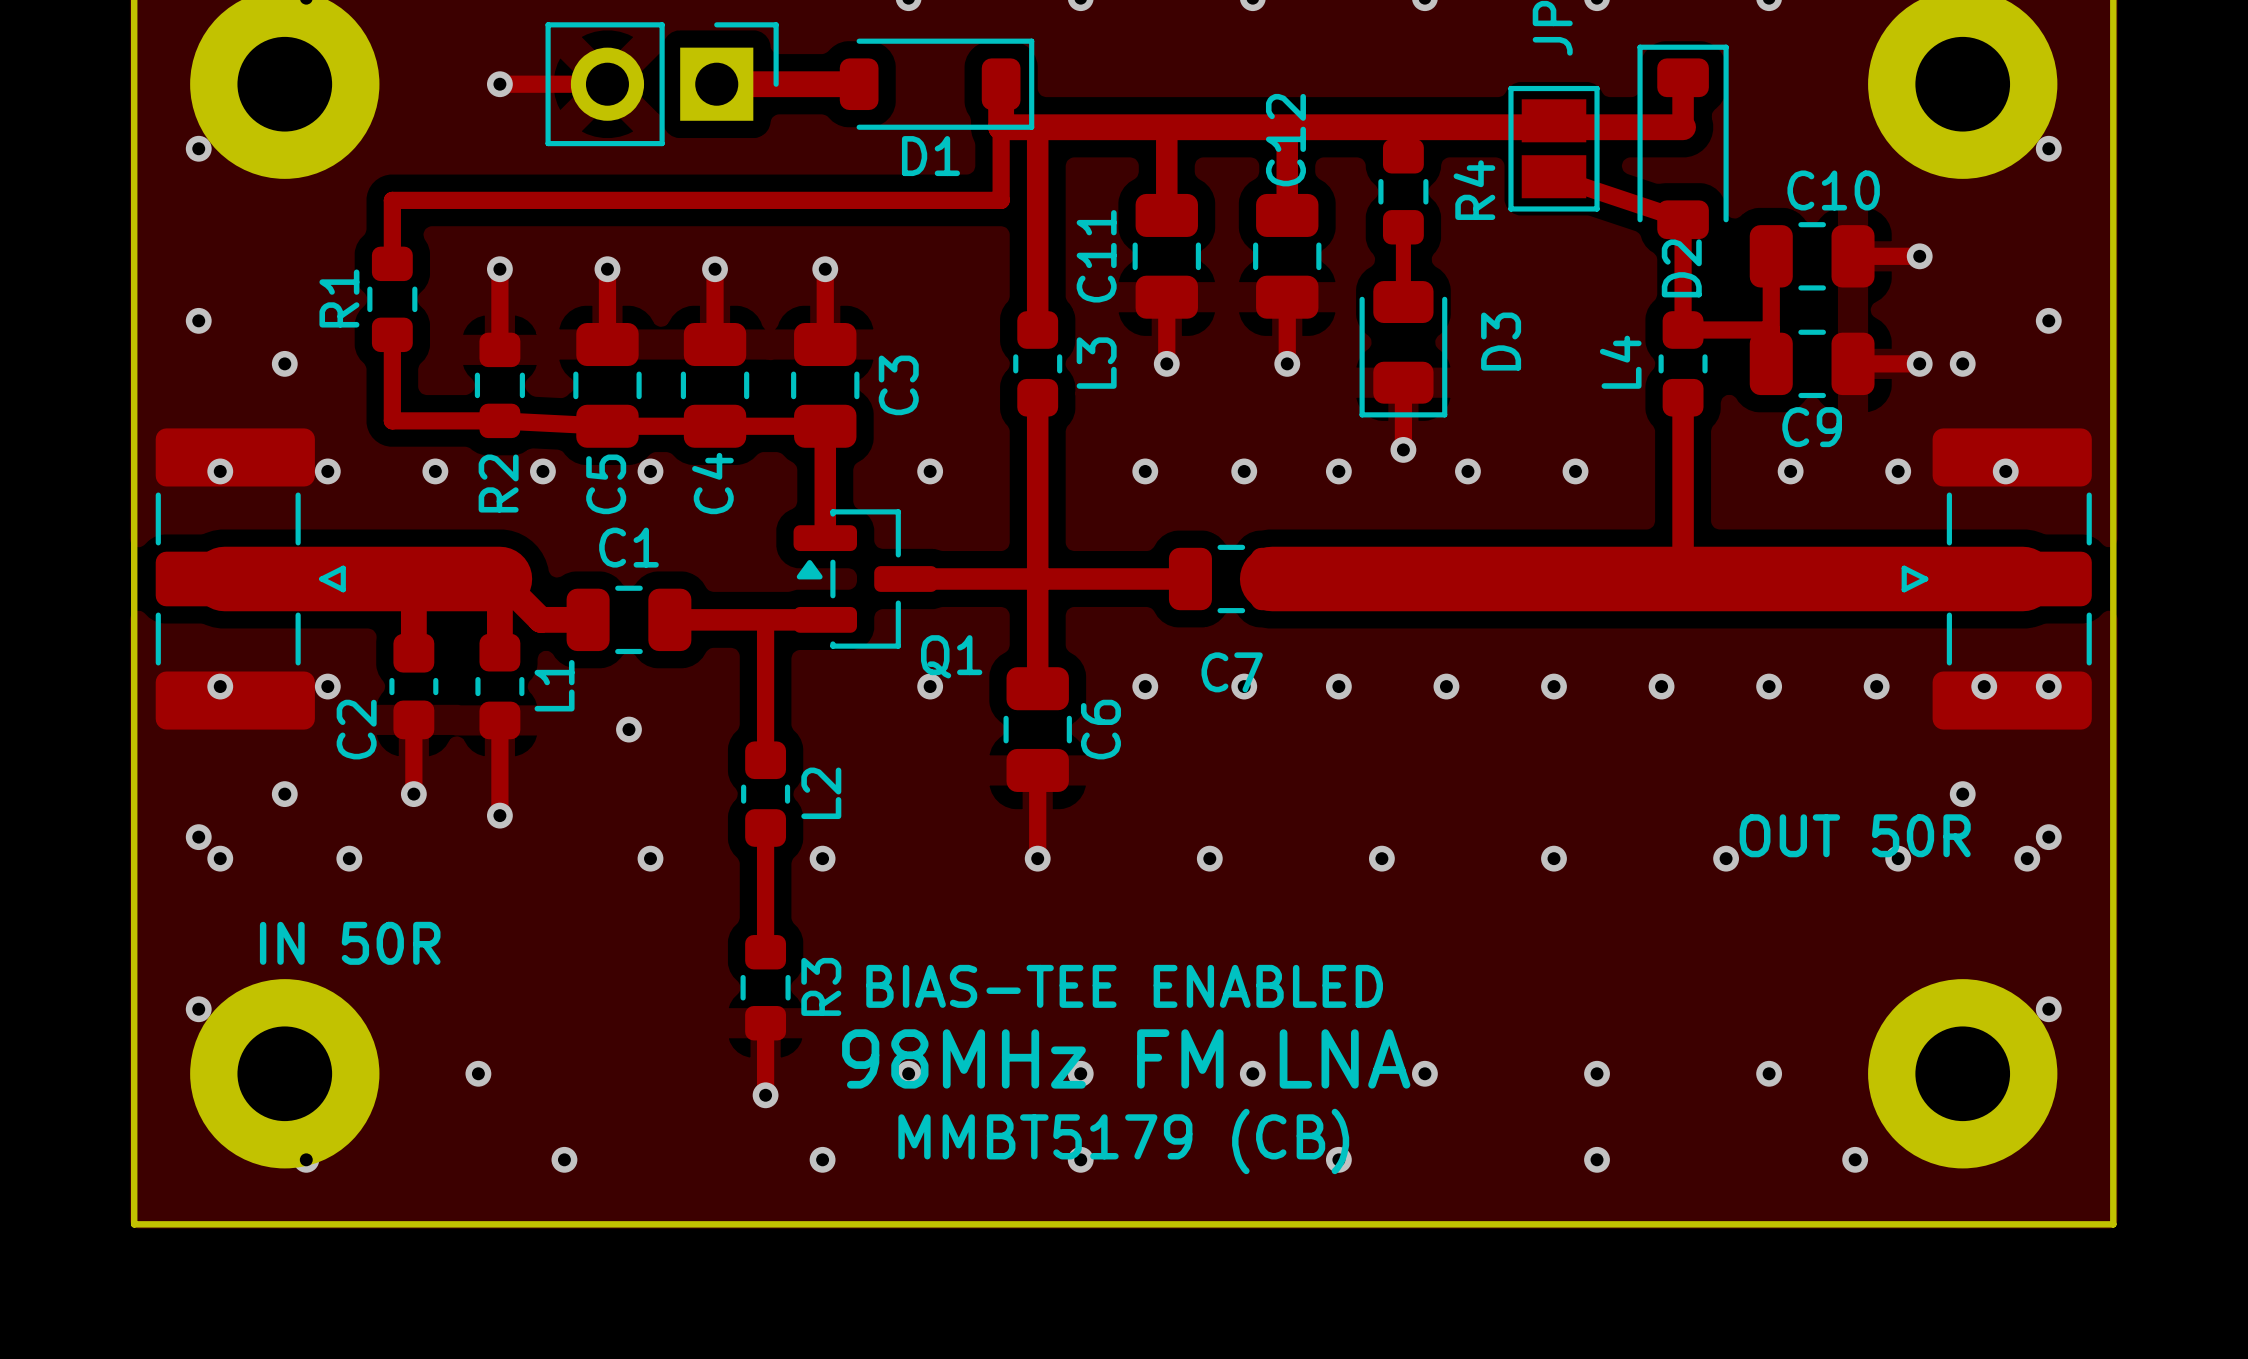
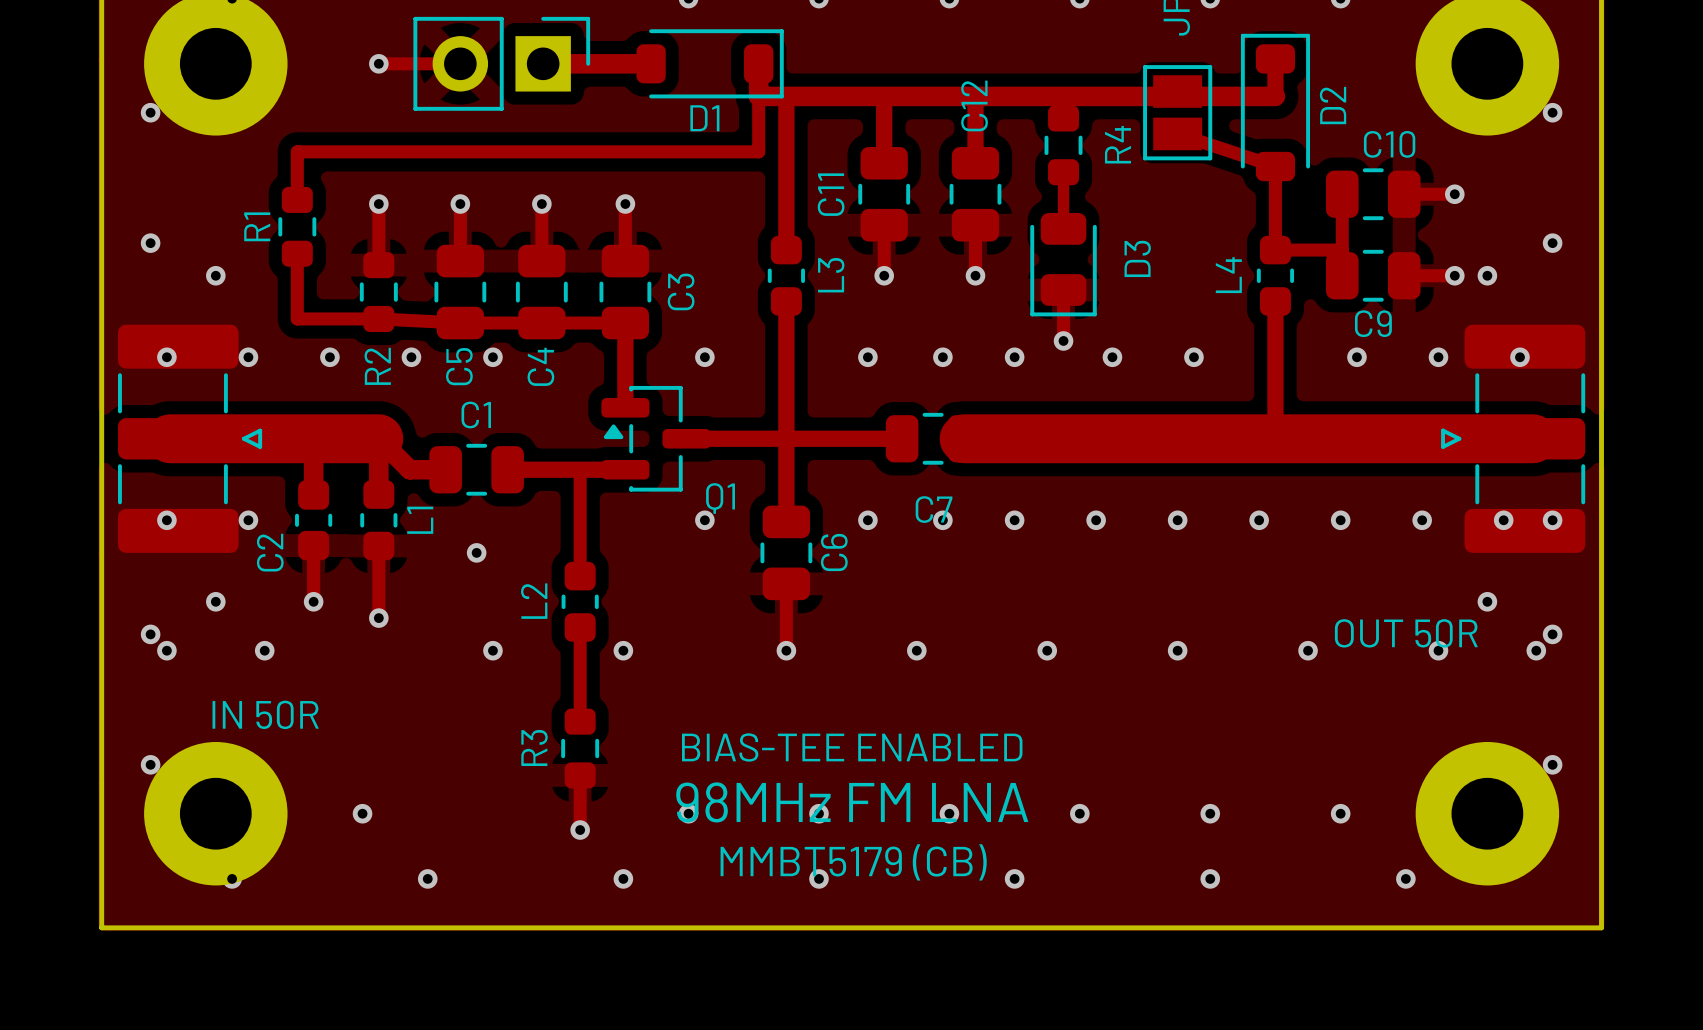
D2 name position: D2 (1681, 268) -> D2 (1333, 105)
L2 name position: L2 (821, 793) -> L2 (534, 601)
R3 name position: R3 (821, 986) -> R3 (534, 747)

